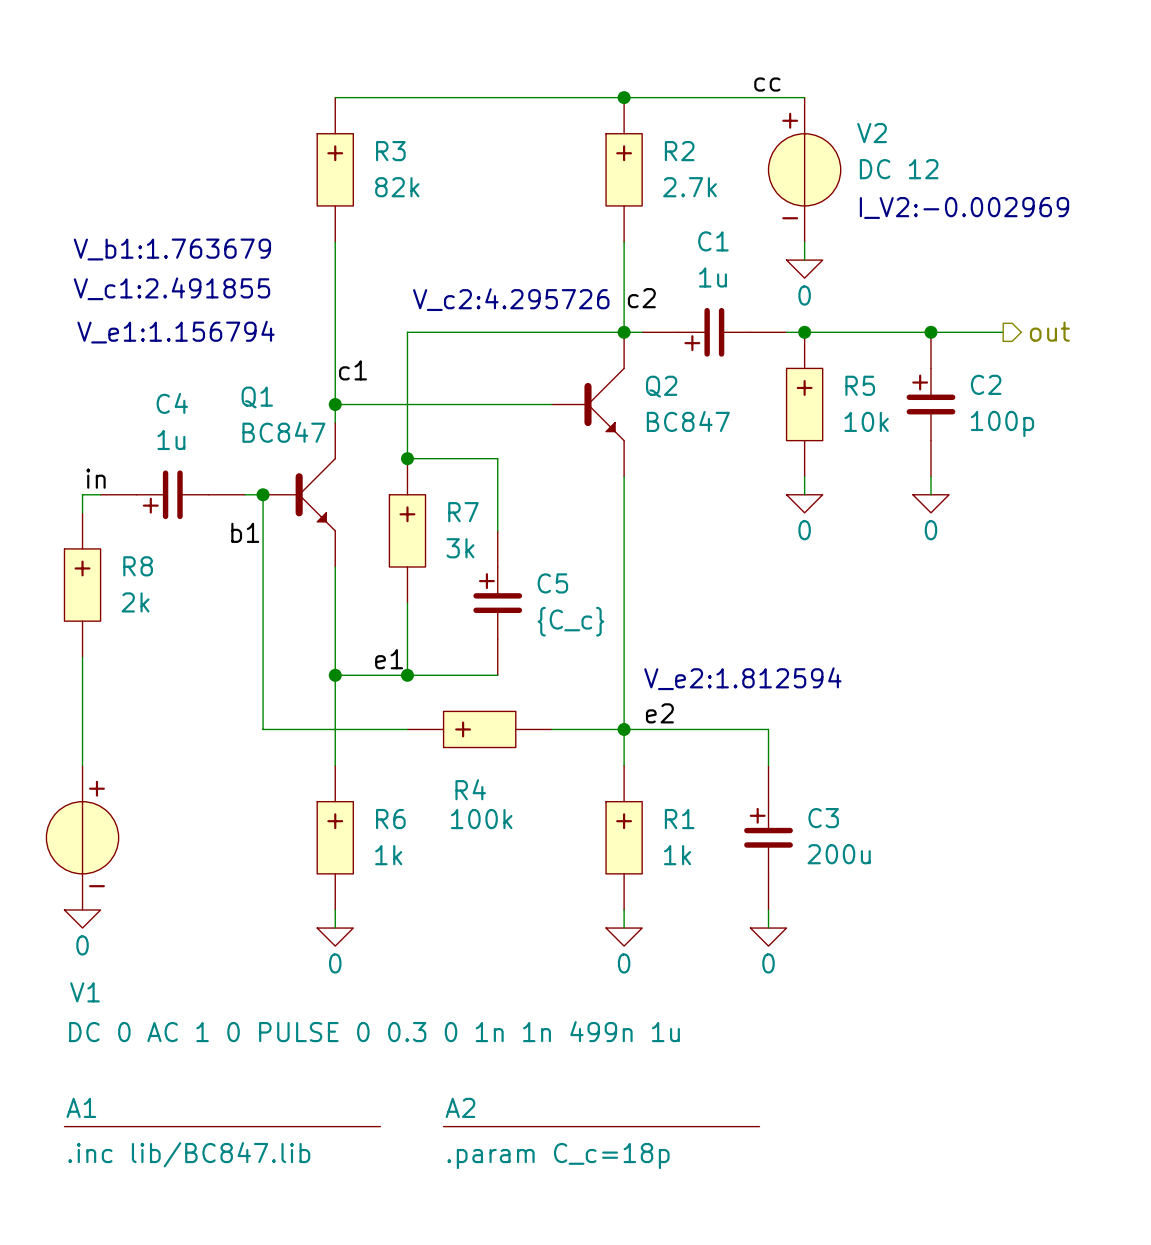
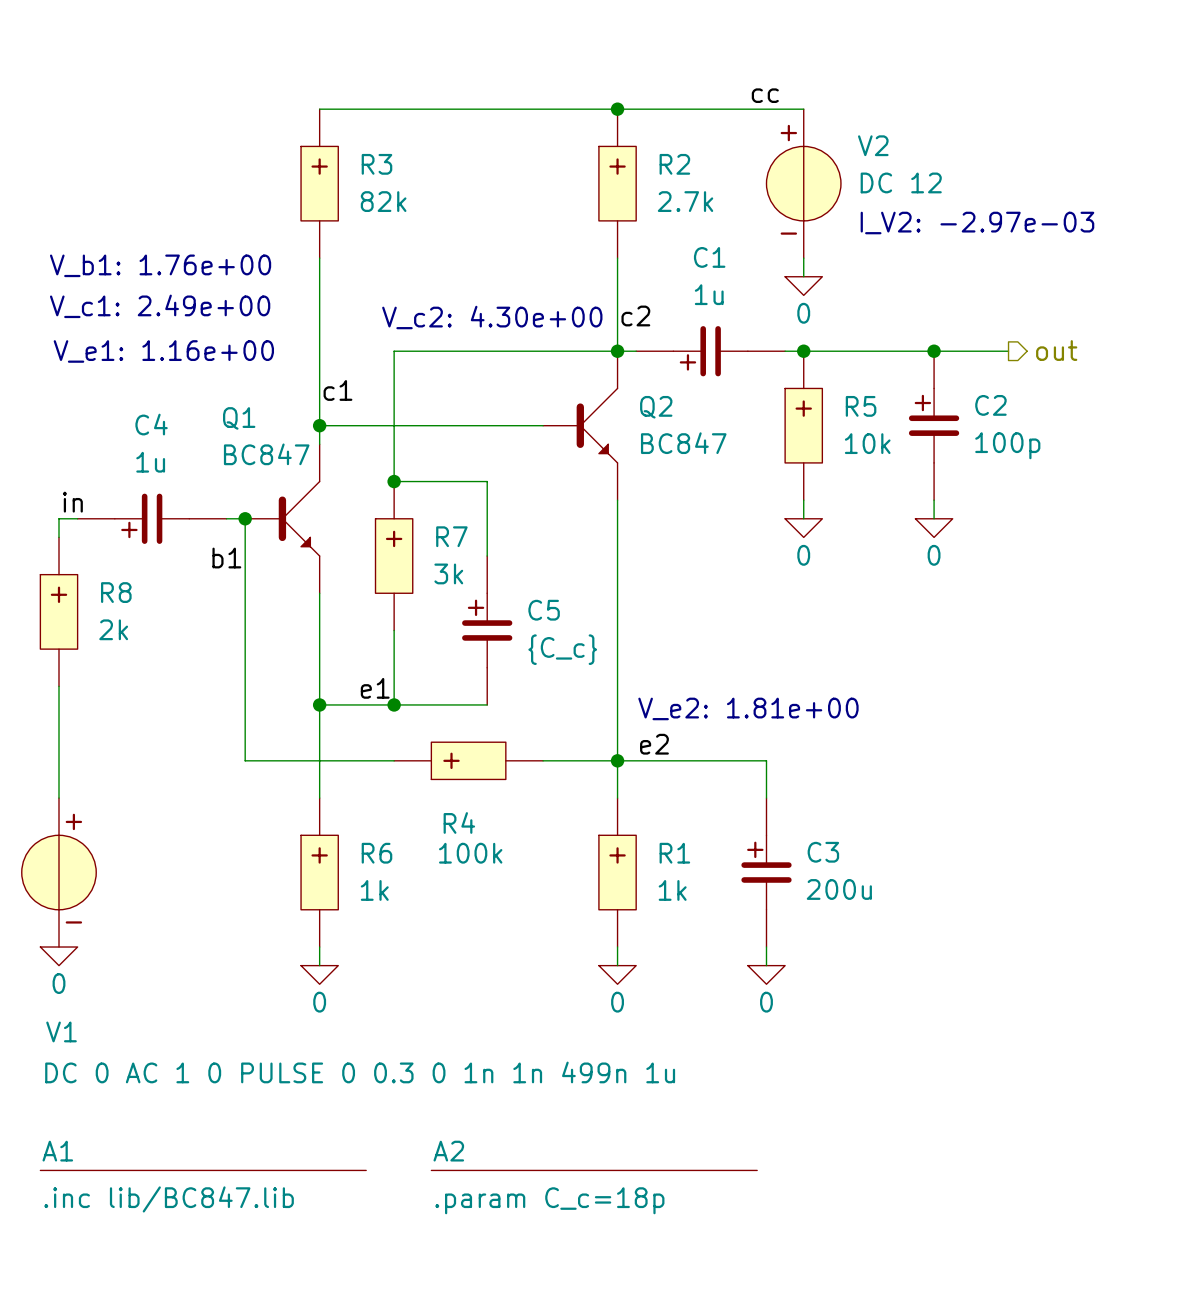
text: I_V2:-0.002969 (964, 207) -> I_V2: -2.97e-03 (977, 223)
text: V_b1:1.763679 (172, 249) -> V_b1: 1.76e+00 (160, 265)
text: V_c1:2.491855 (171, 288) -> V_c1: 2.49e+00 (160, 306)
text: V_c2:4.295726 (511, 299) -> V_c2: 4.30e+00 (492, 317)
text: V_e1:1.156794 (176, 332) -> V_e1: 1.16e+00 (163, 351)
text: V_e2:1.812594 (742, 678) -> V_e2: 1.81e+00 (748, 708)

